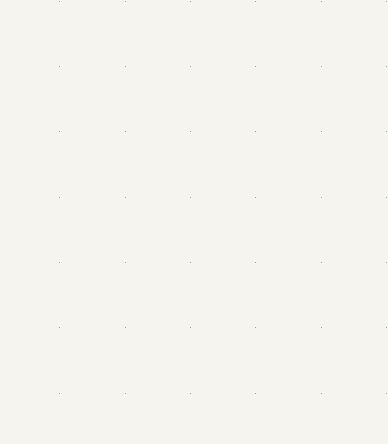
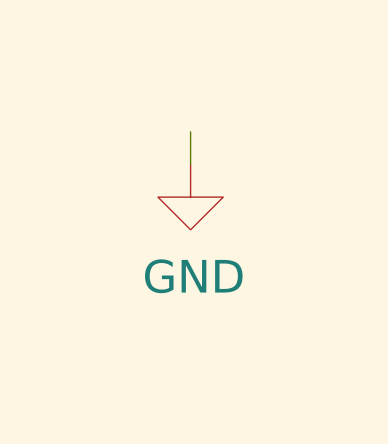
wire: none -> (190, 131) (190, 164)
power symbol: none -> GND (190, 197)

